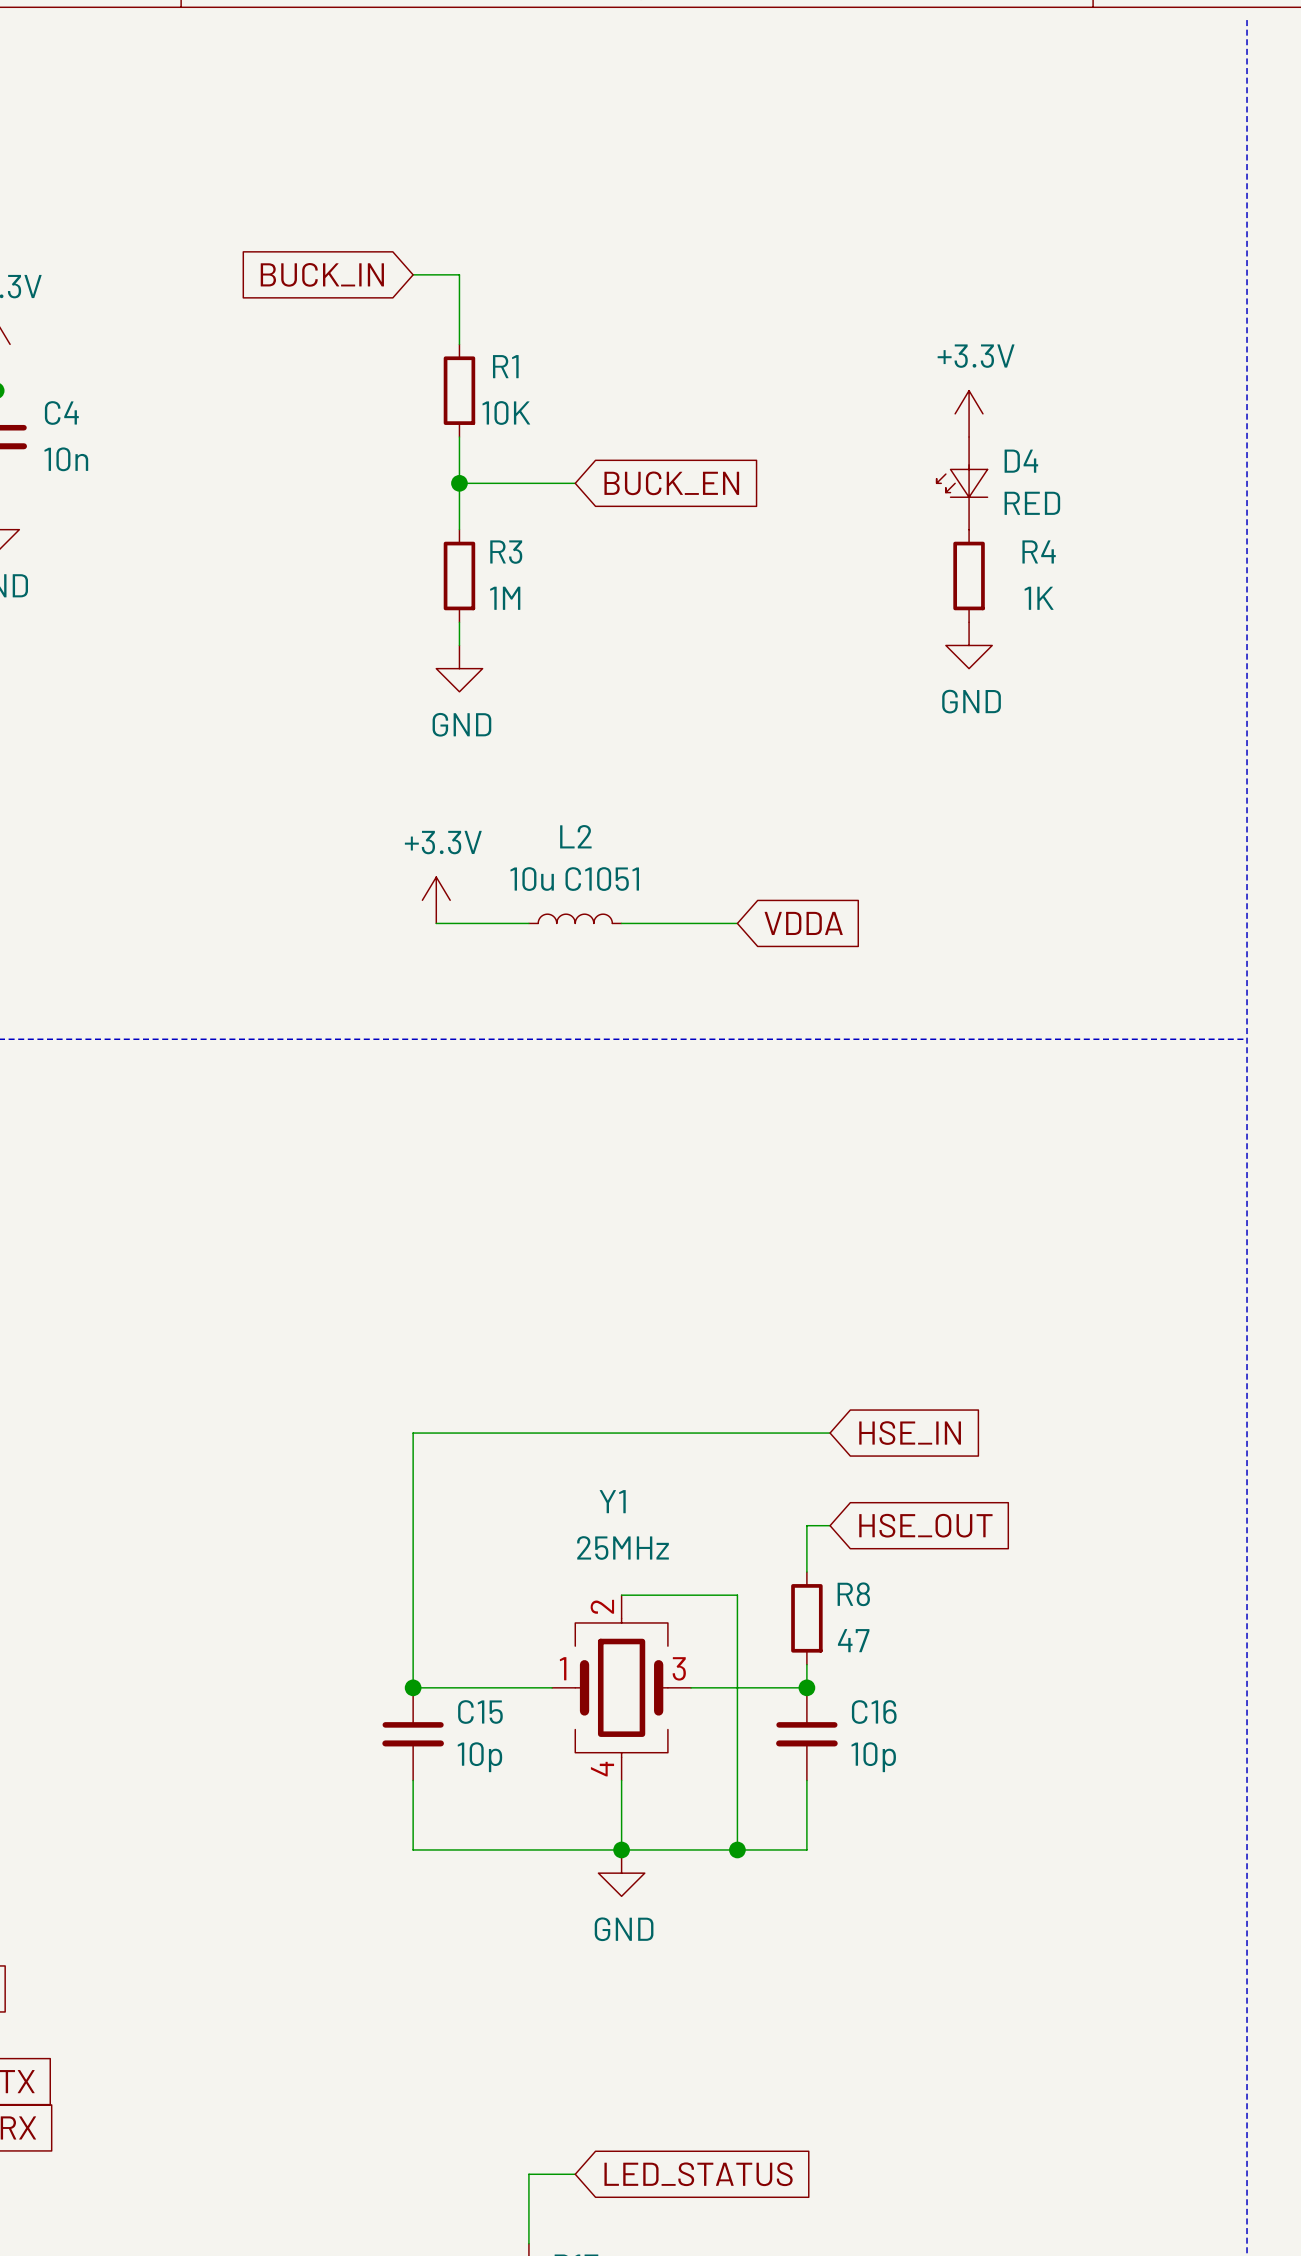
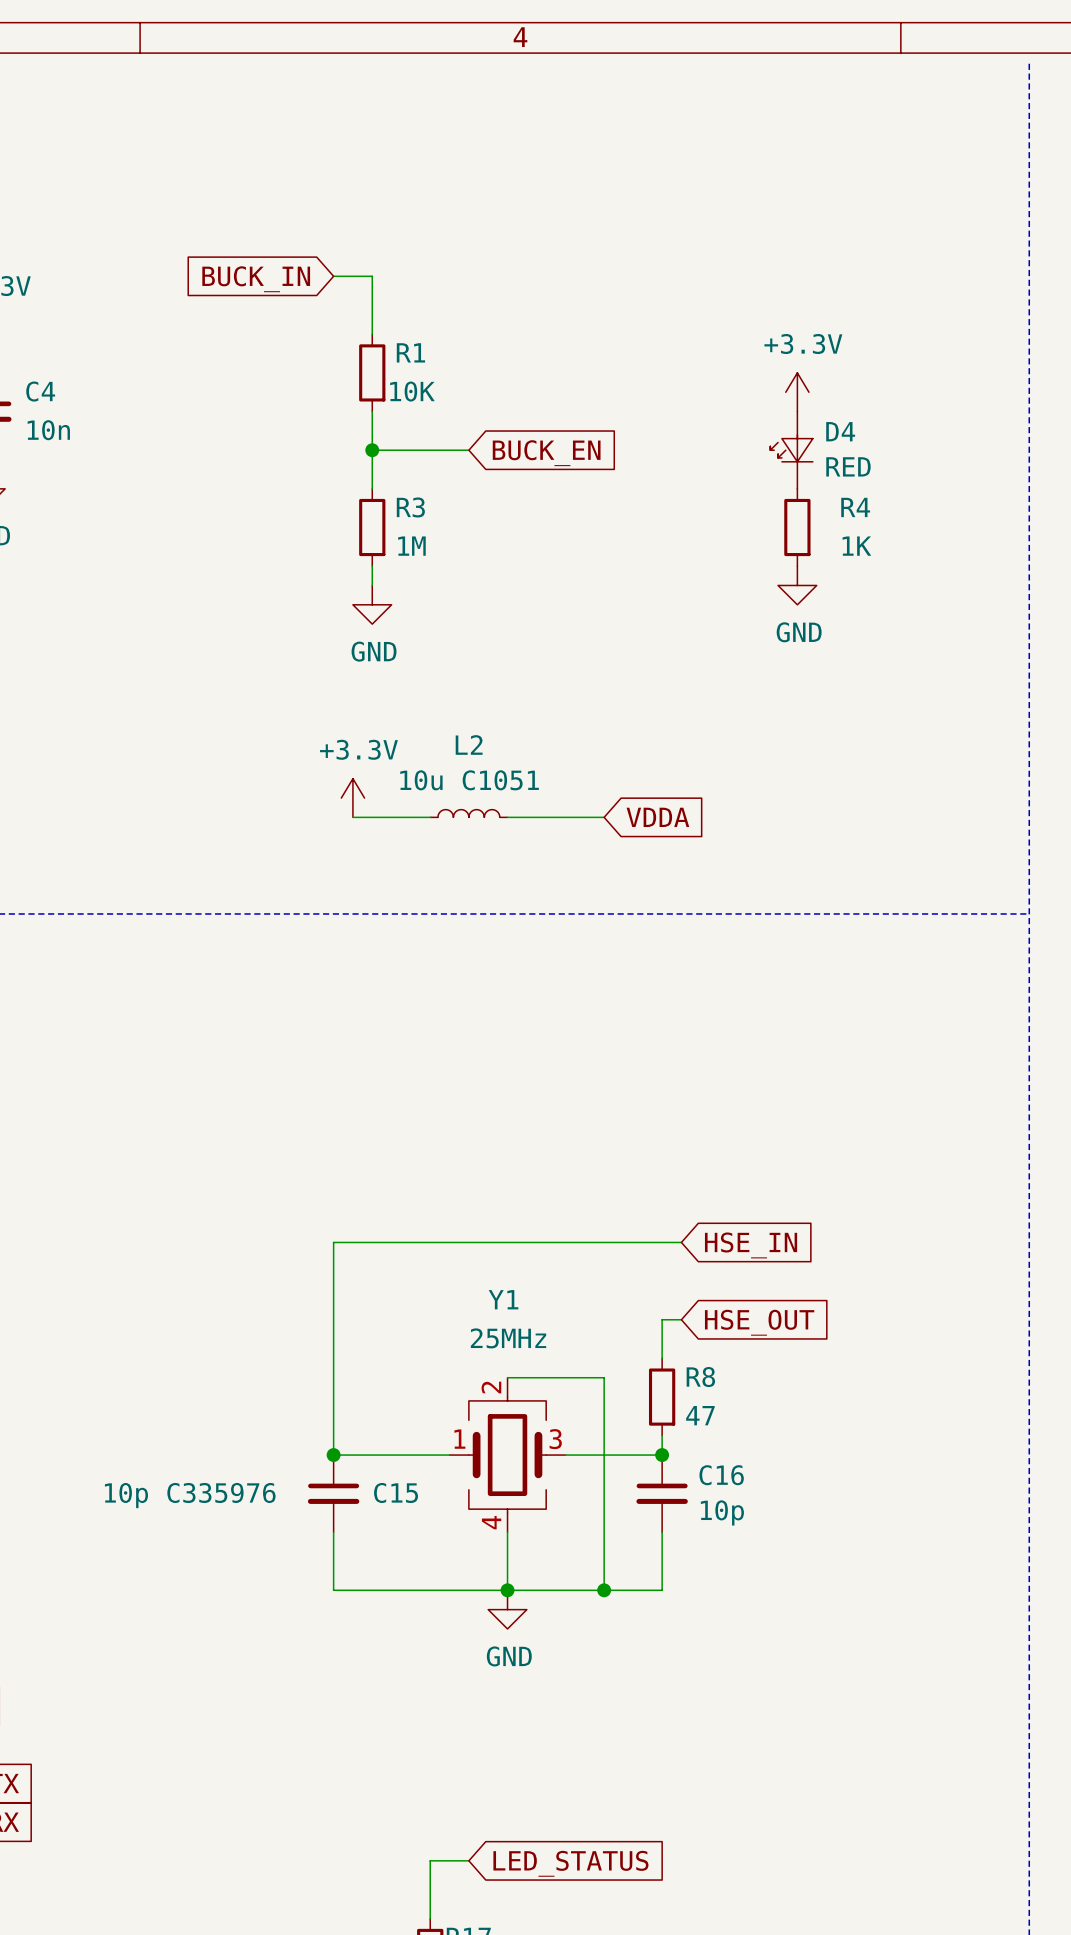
C15 name position: C15 (480, 1712) -> C15 (396, 1492)
C15 value: 10p (479, 1757) -> 10p C335976 (190, 1495)

